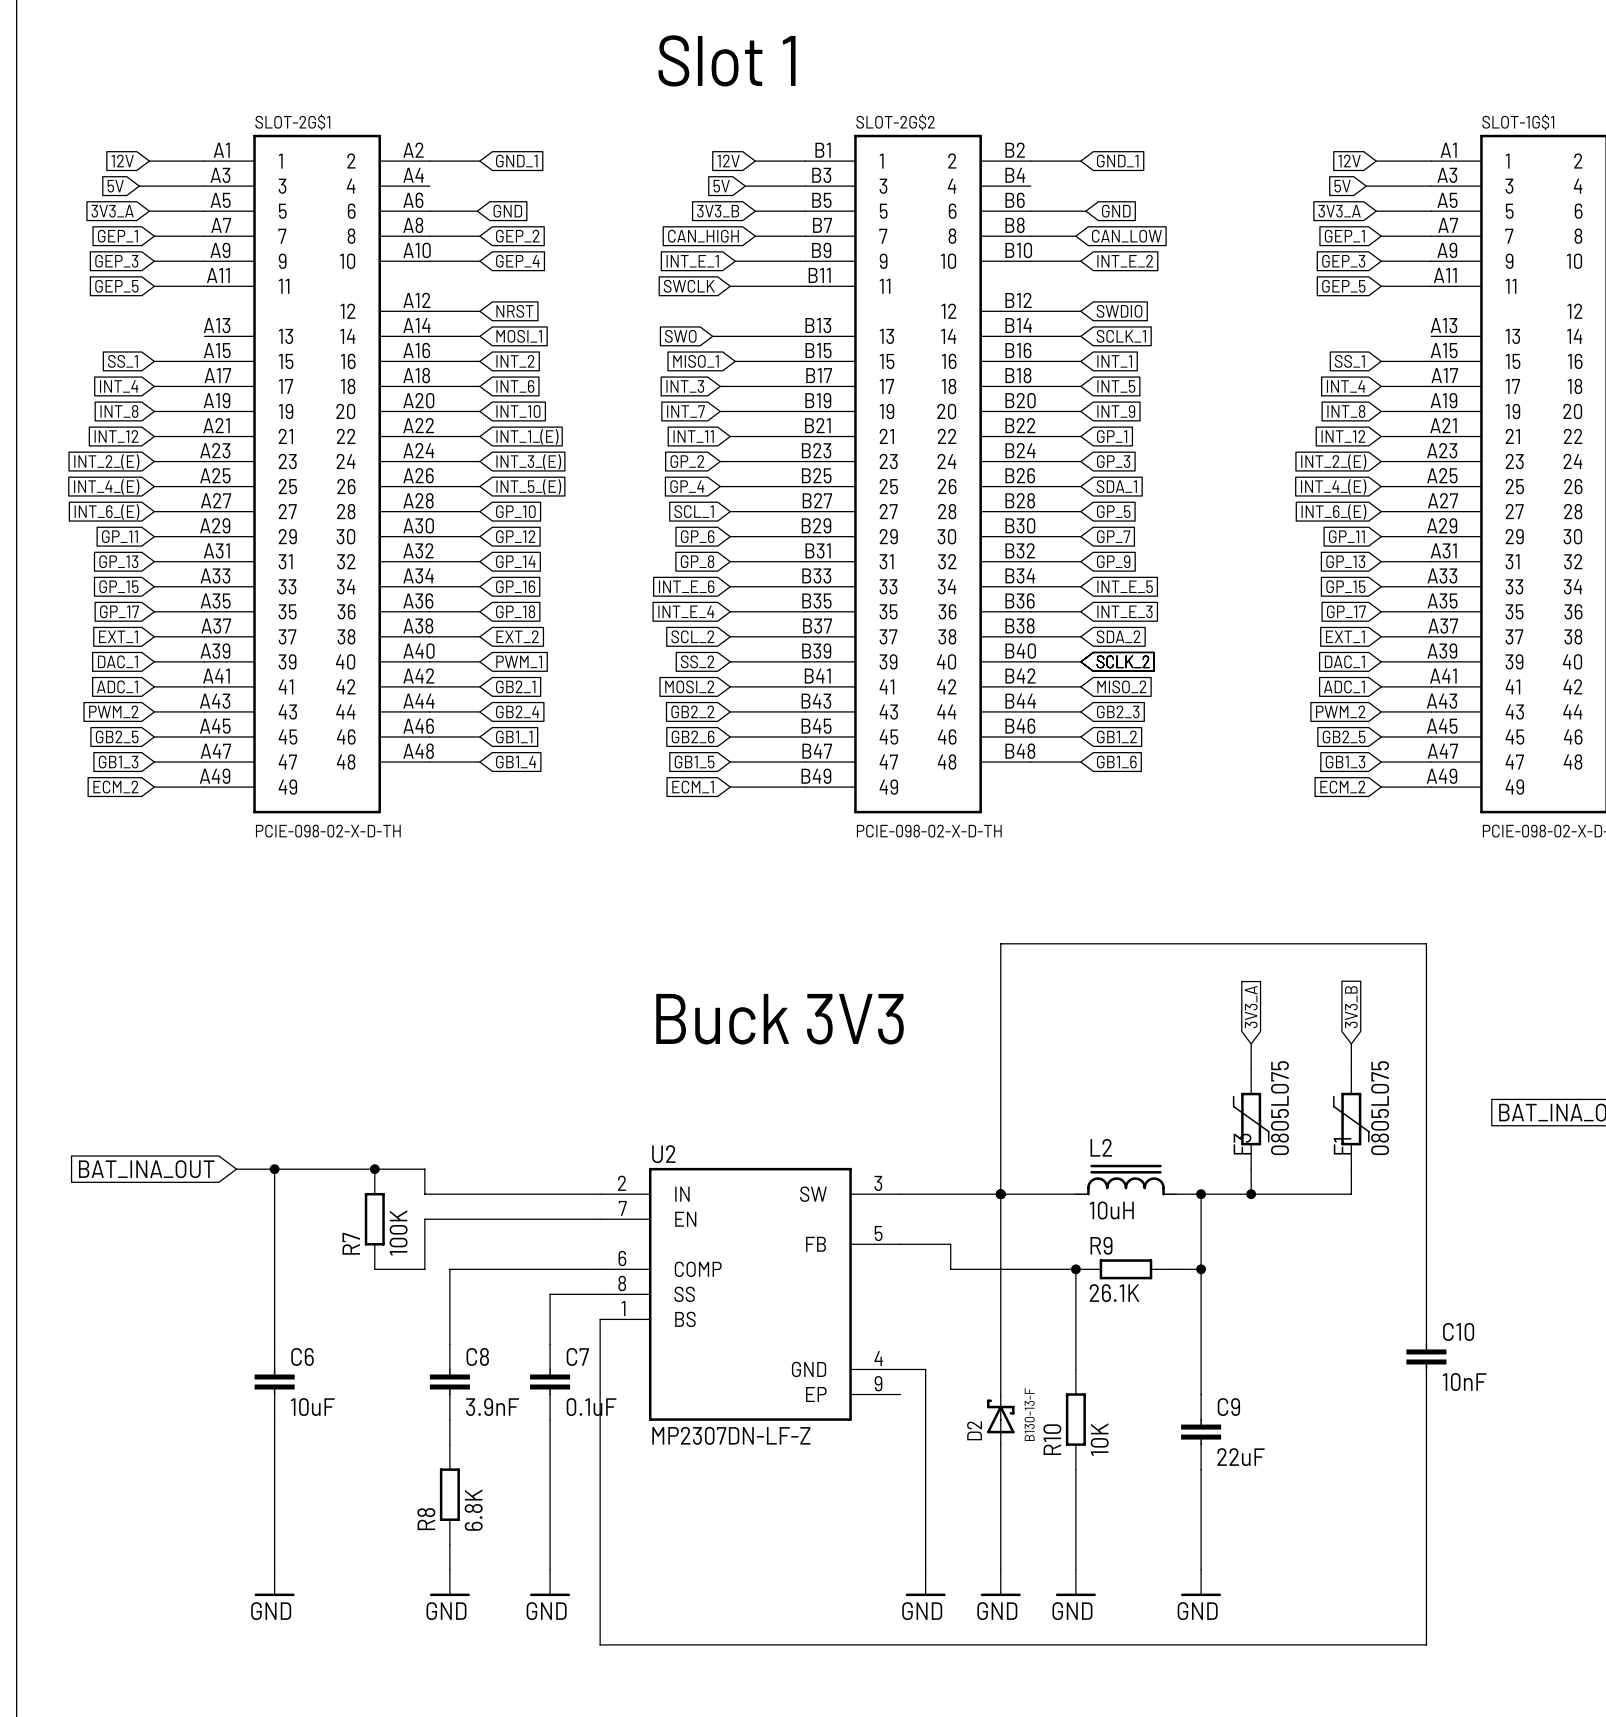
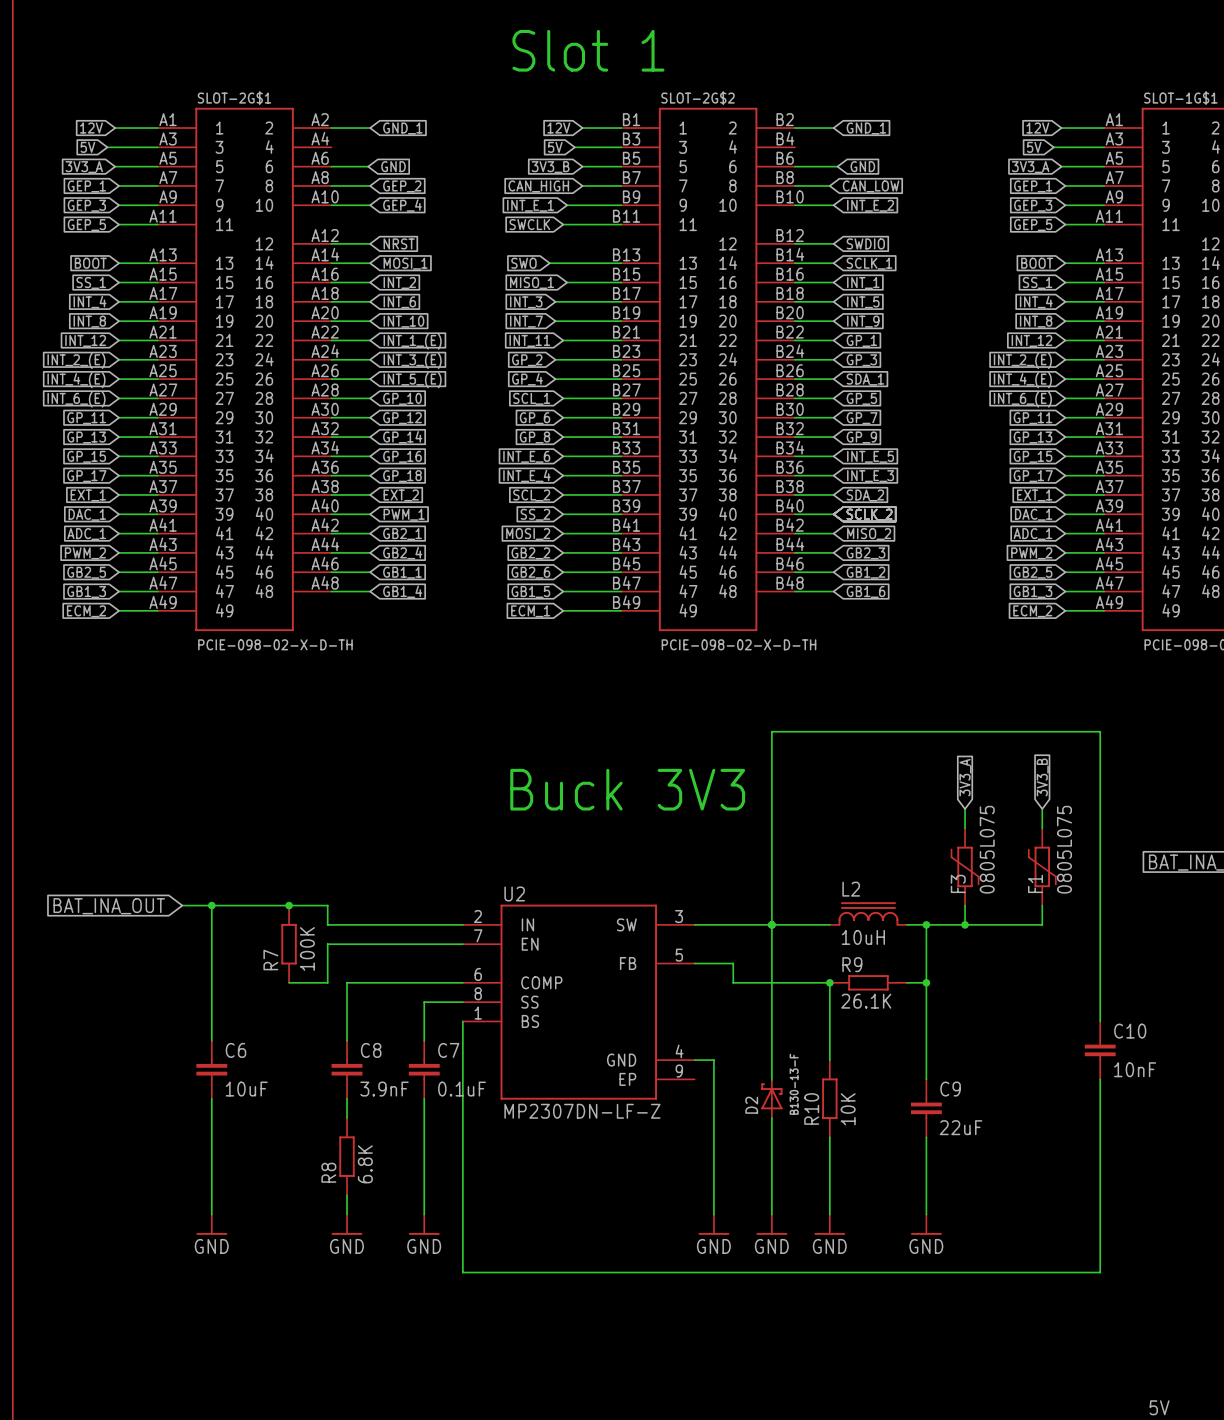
global label: none -> BOOT (90, 263)
wire: none -> (119, 263) (157, 263)
global label: none -> BOOT (1037, 263)
wire: none -> (1065, 263) (1104, 263)

